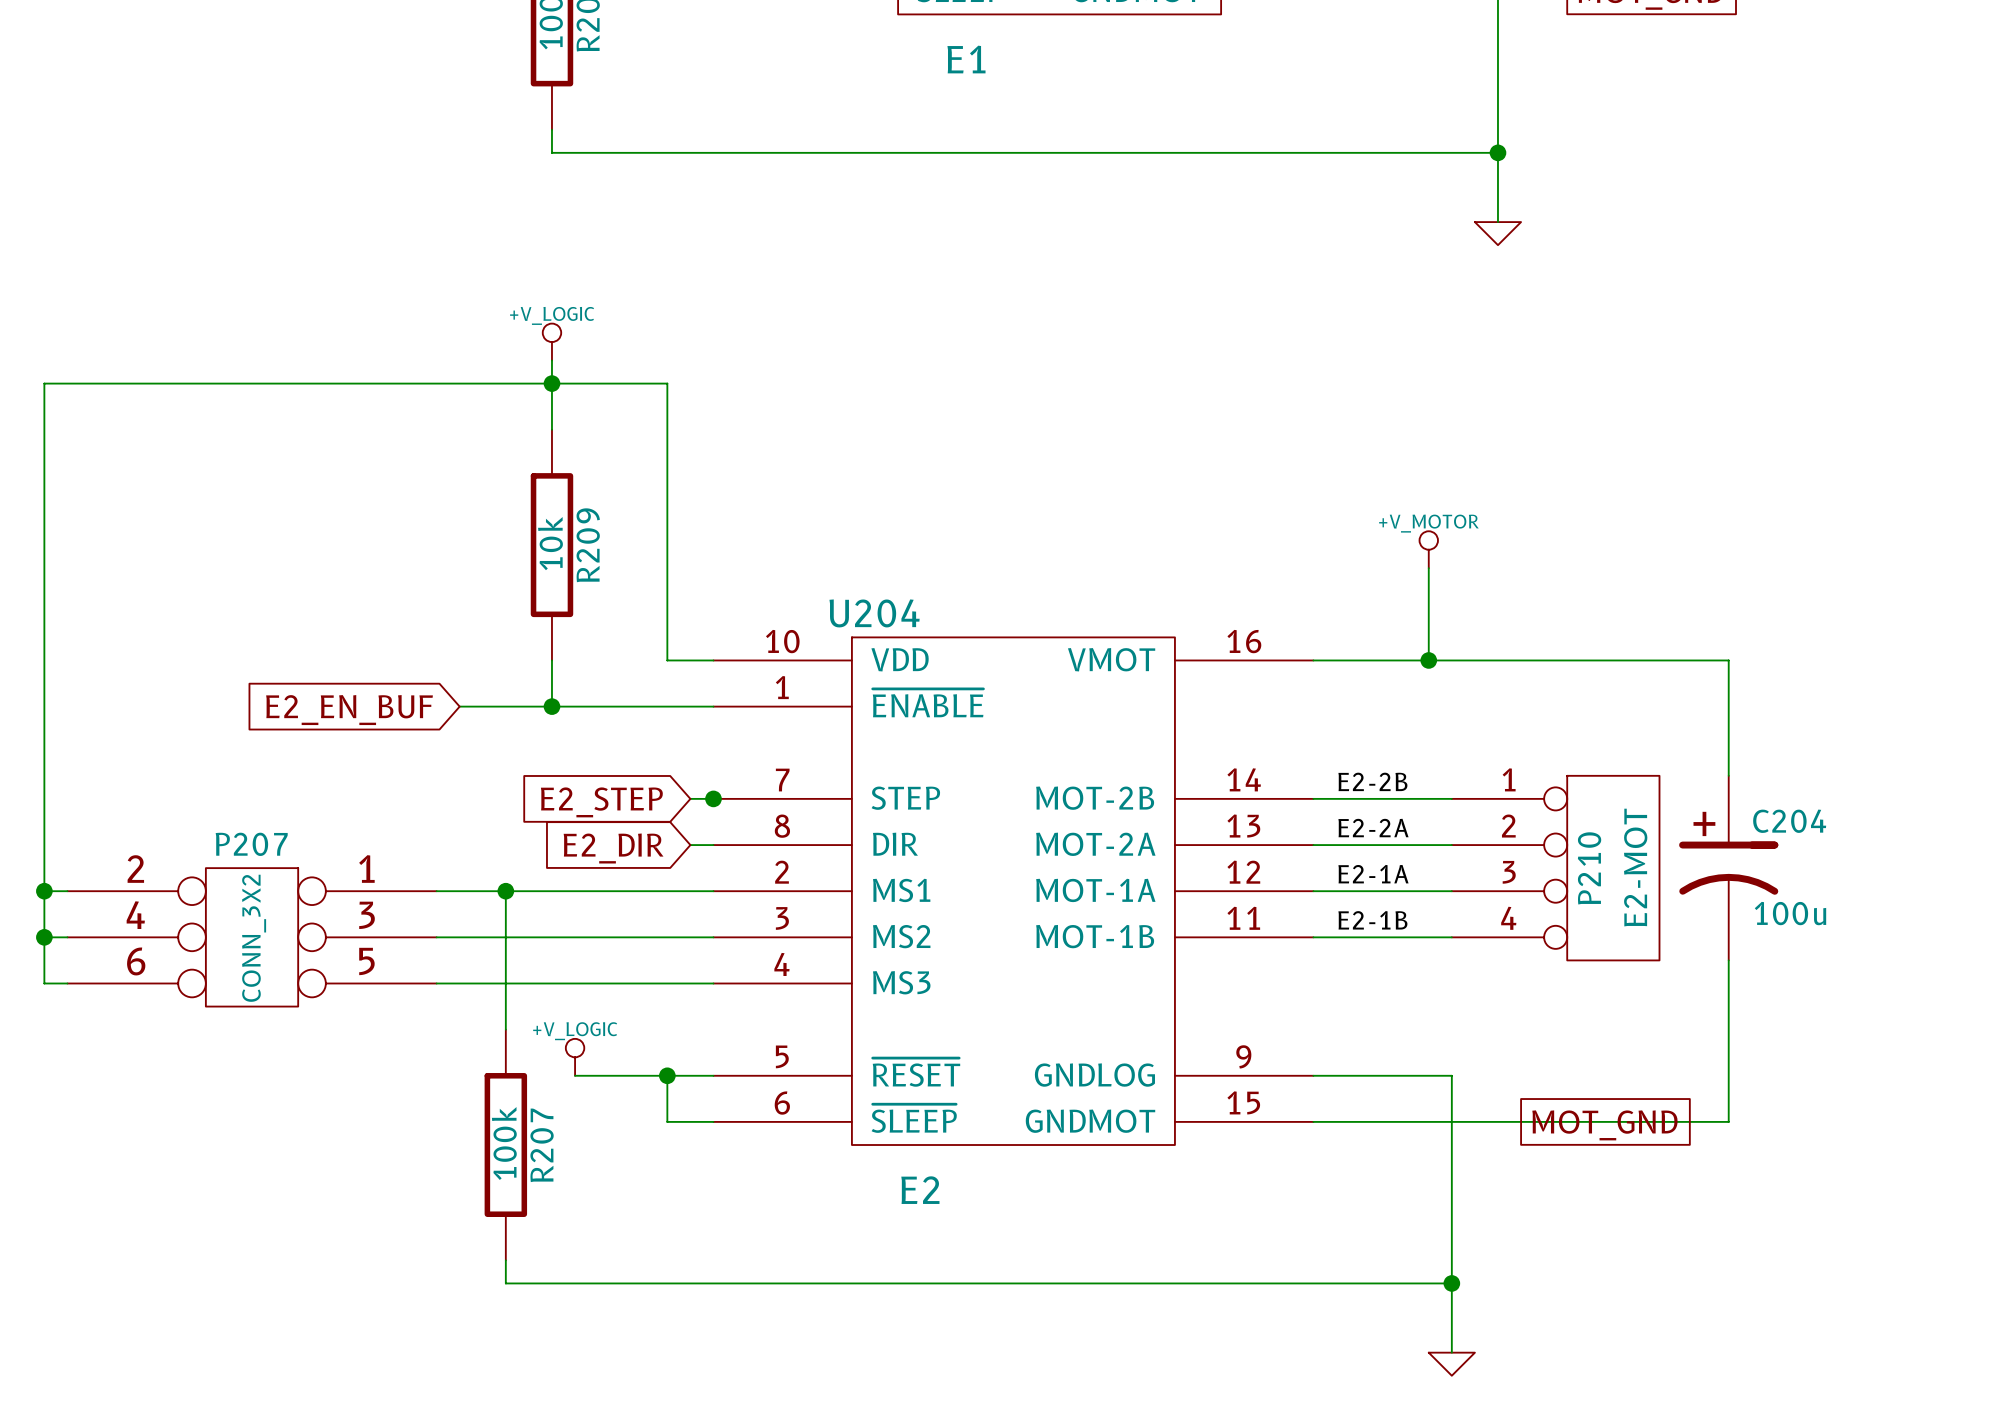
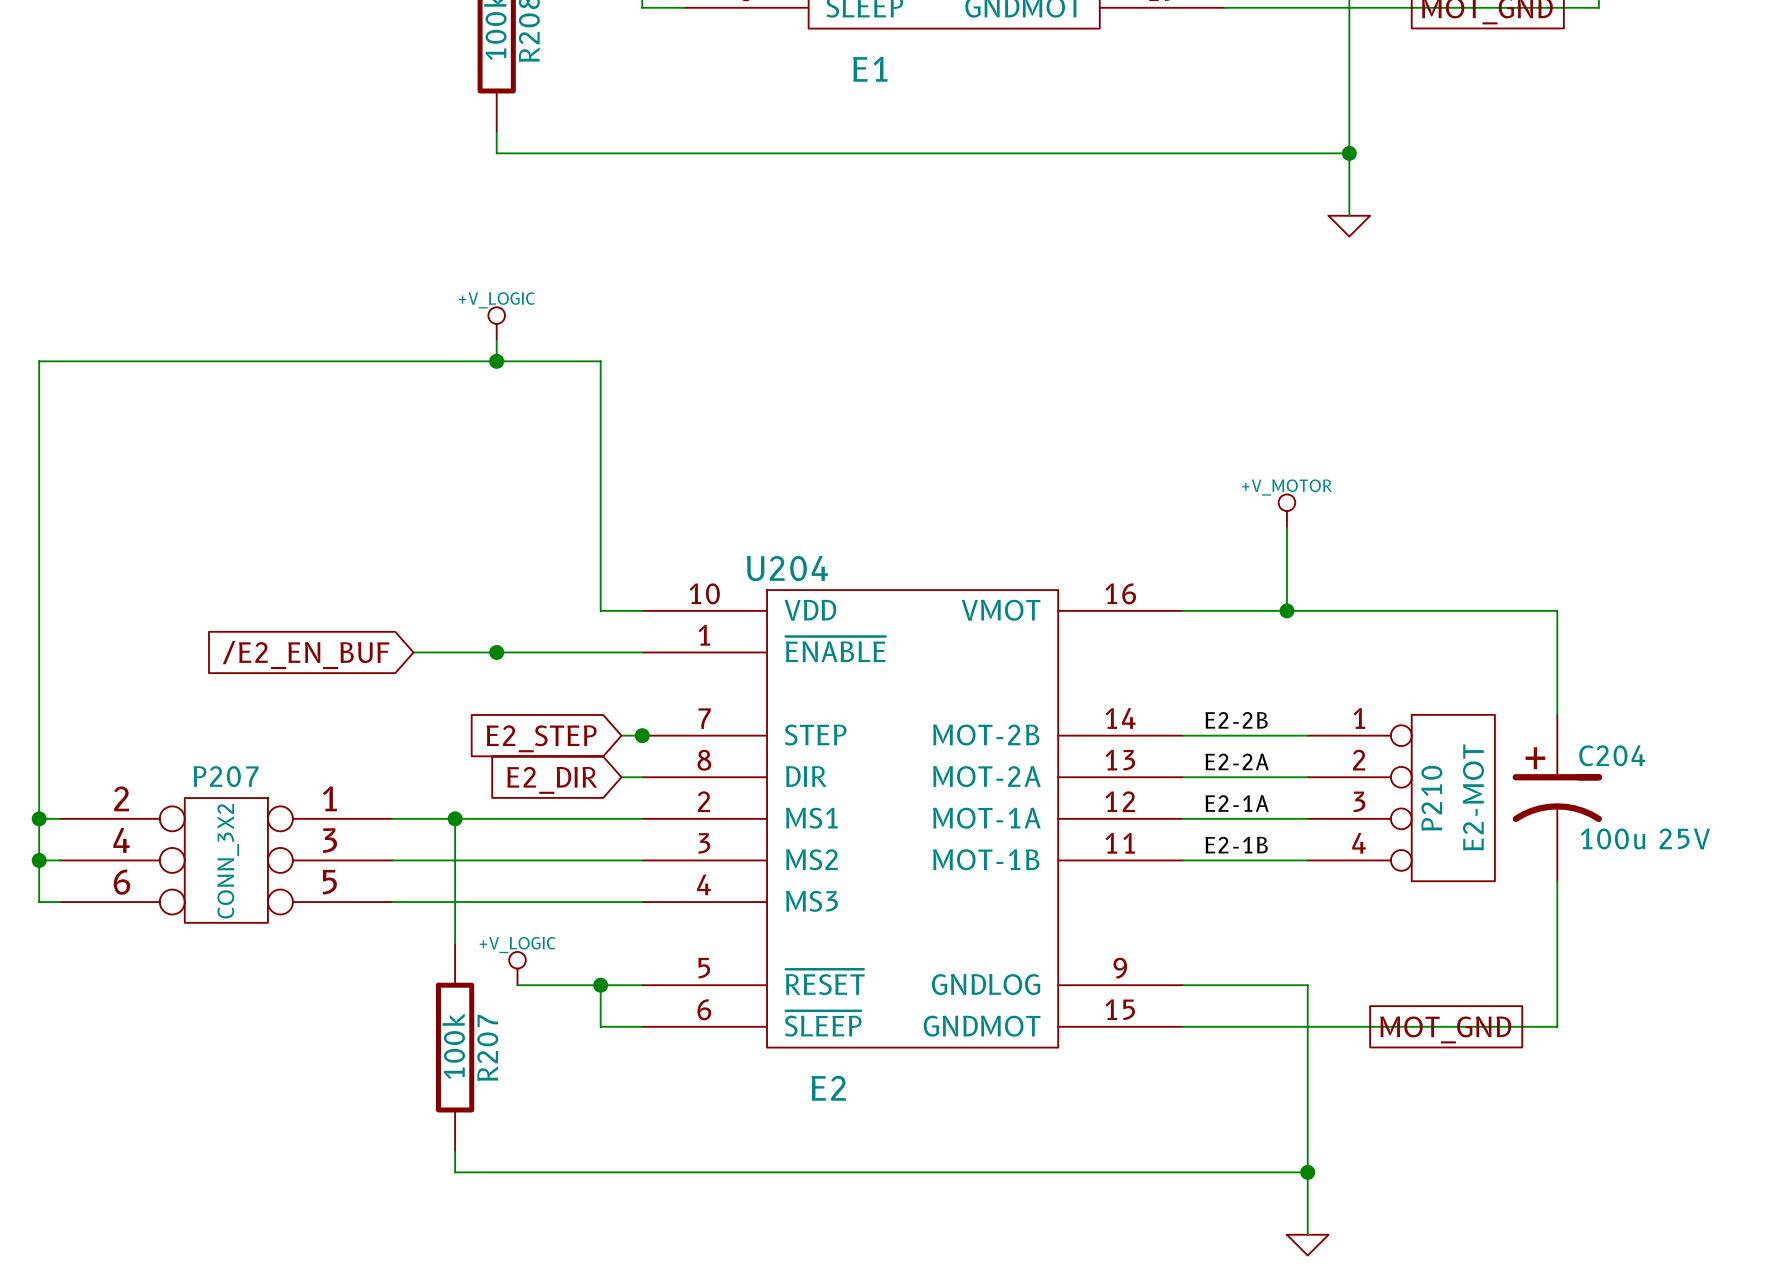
wire: (551, 383) (551, 429) -> none
R209: 10k (551, 545) -> none
wire: (551, 660) (551, 706) -> none
global label: E2_EN_BUF (349, 710) -> /E2_EN_BUF (306, 655)
C204 value: 100u (1790, 913) -> 100u 25V (1645, 839)

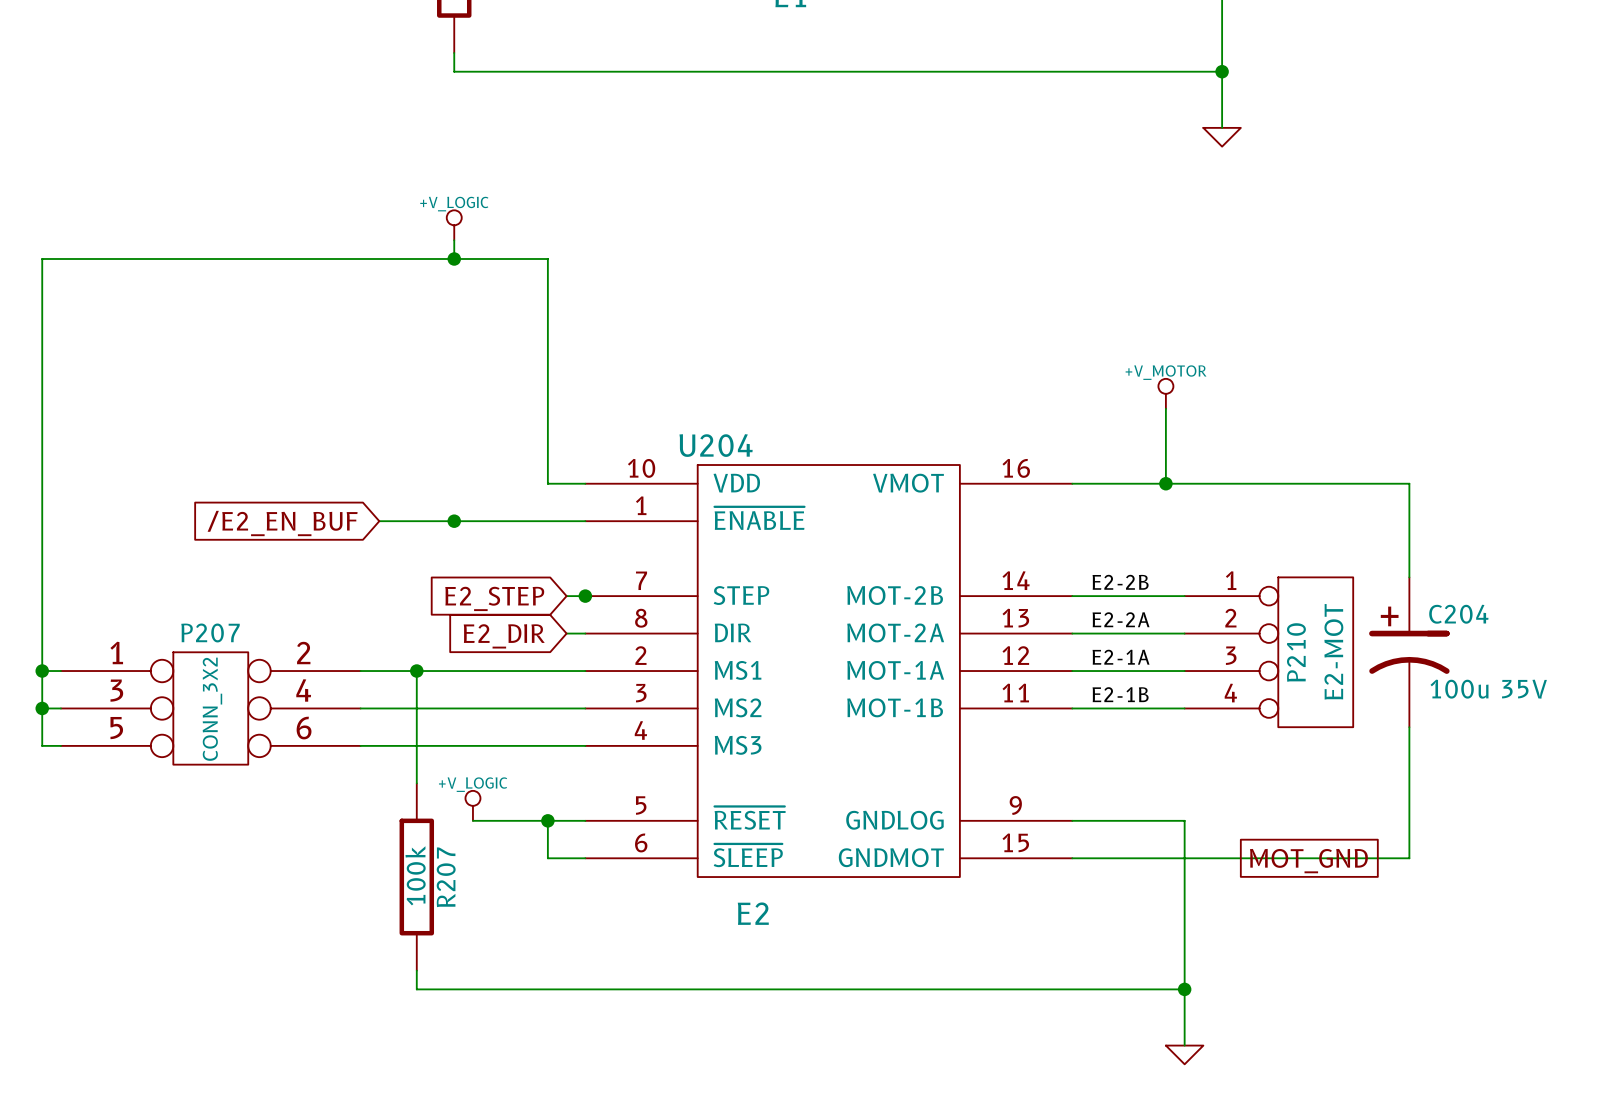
C204 value: 100u 25V (1645, 839) -> 100u 35V (1488, 689)
P207 flip: as is (226, 860) -> left-right (210, 708)

